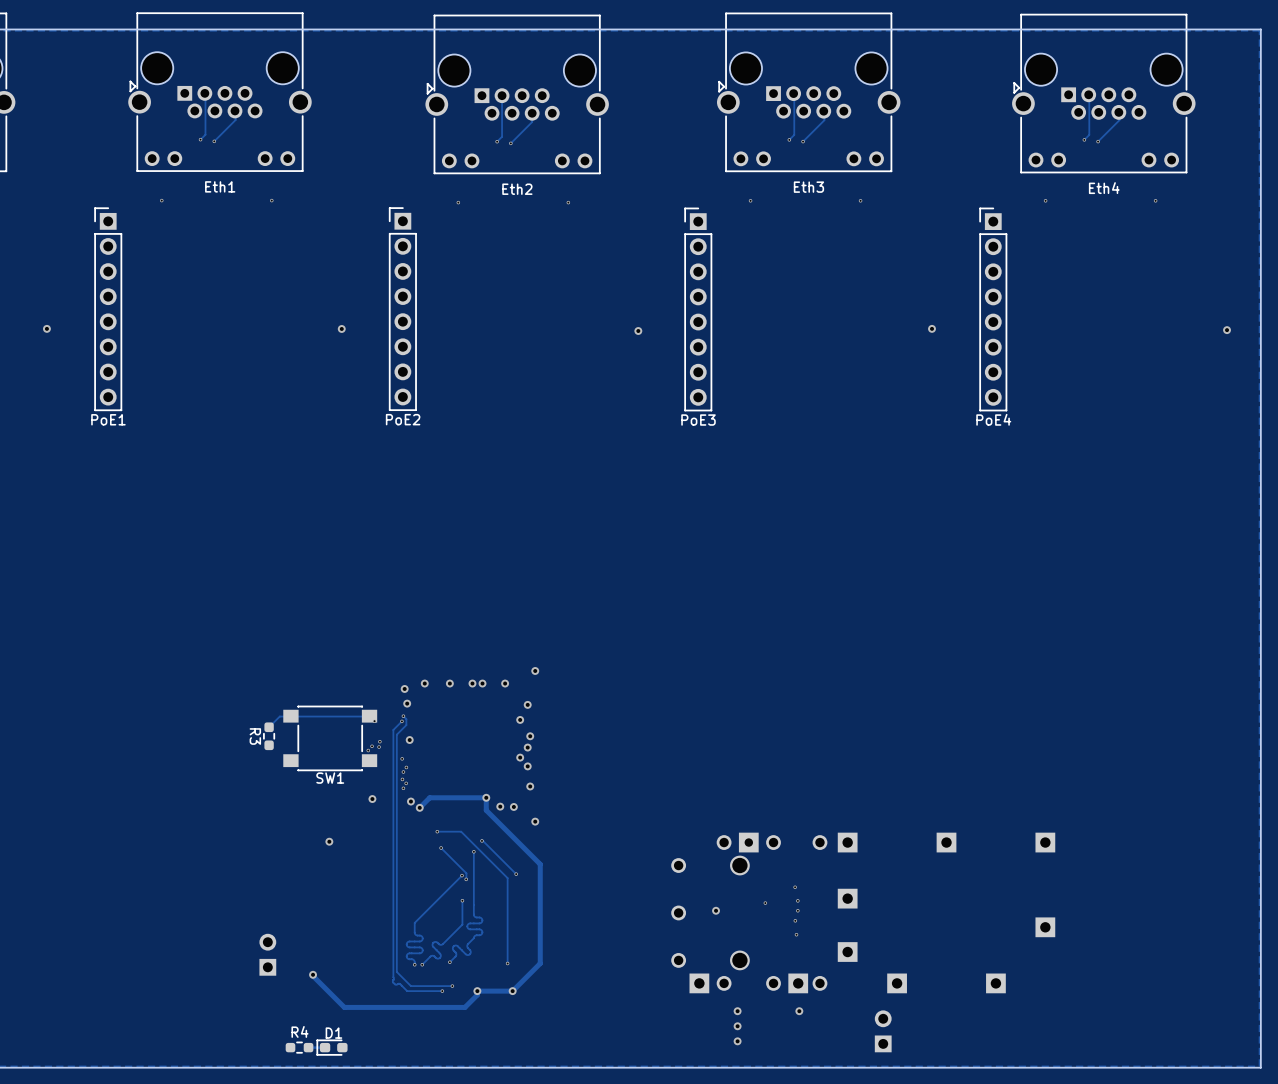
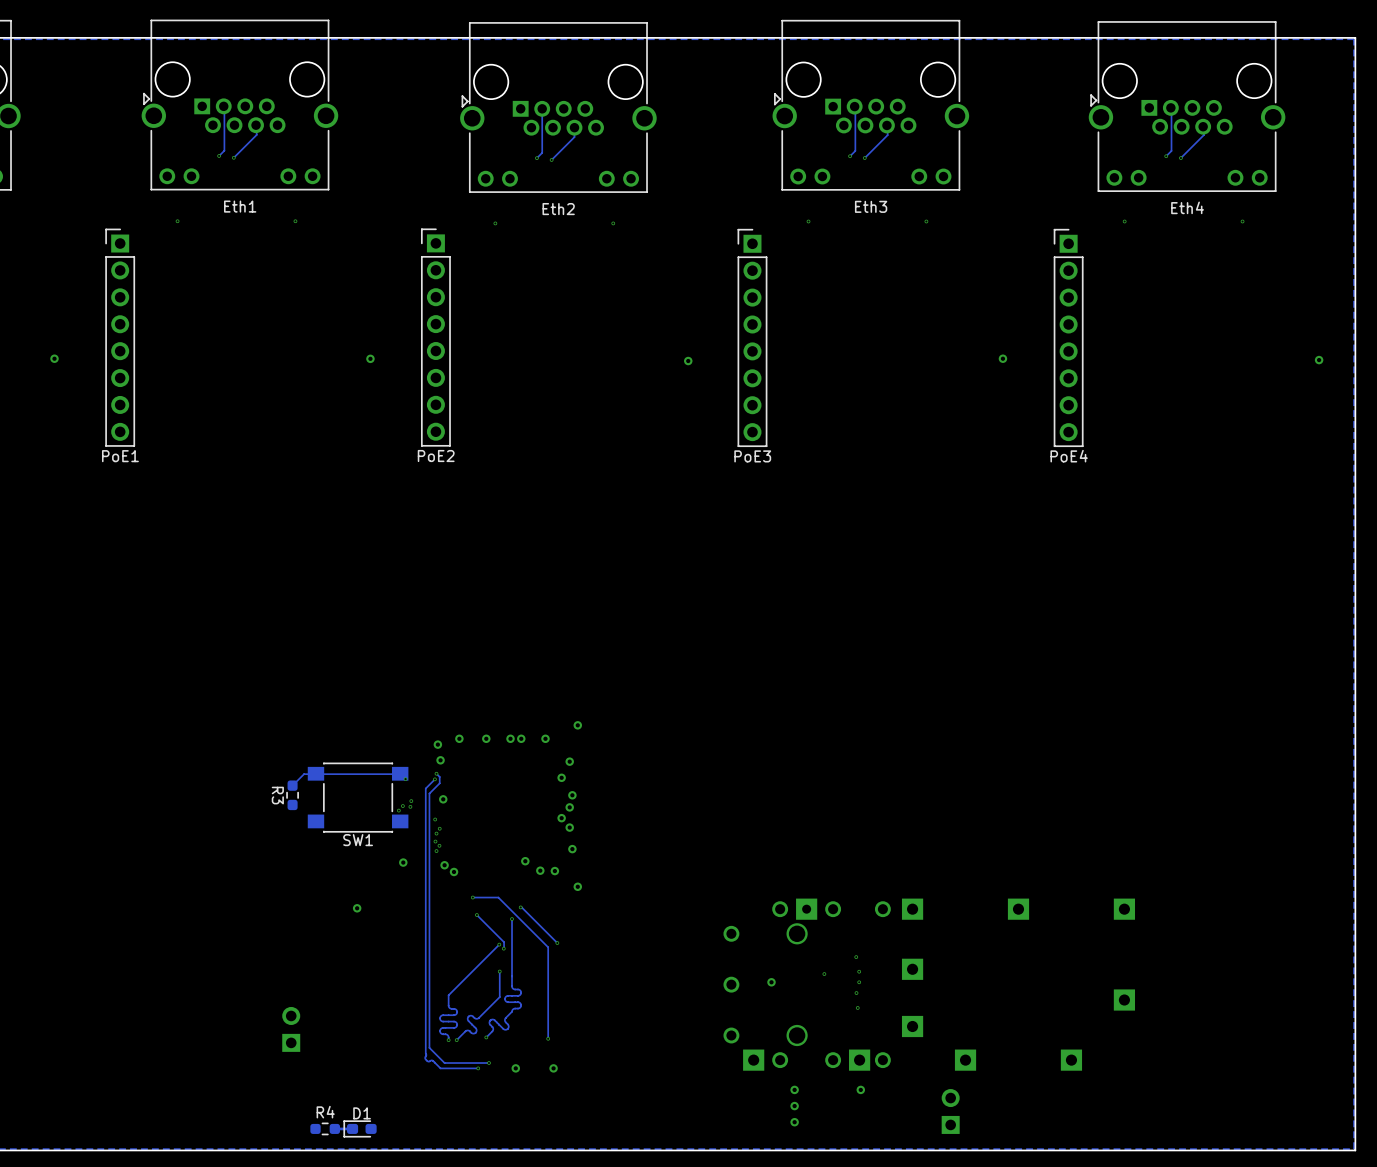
track: (419, 807) (429, 797) (486, 797) (486, 810) (540, 864) (540, 963) (512, 991) (477, 991) (477, 995) (464, 1007) (344, 1007) (313, 974) -> none
via: (313, 974) -> none

